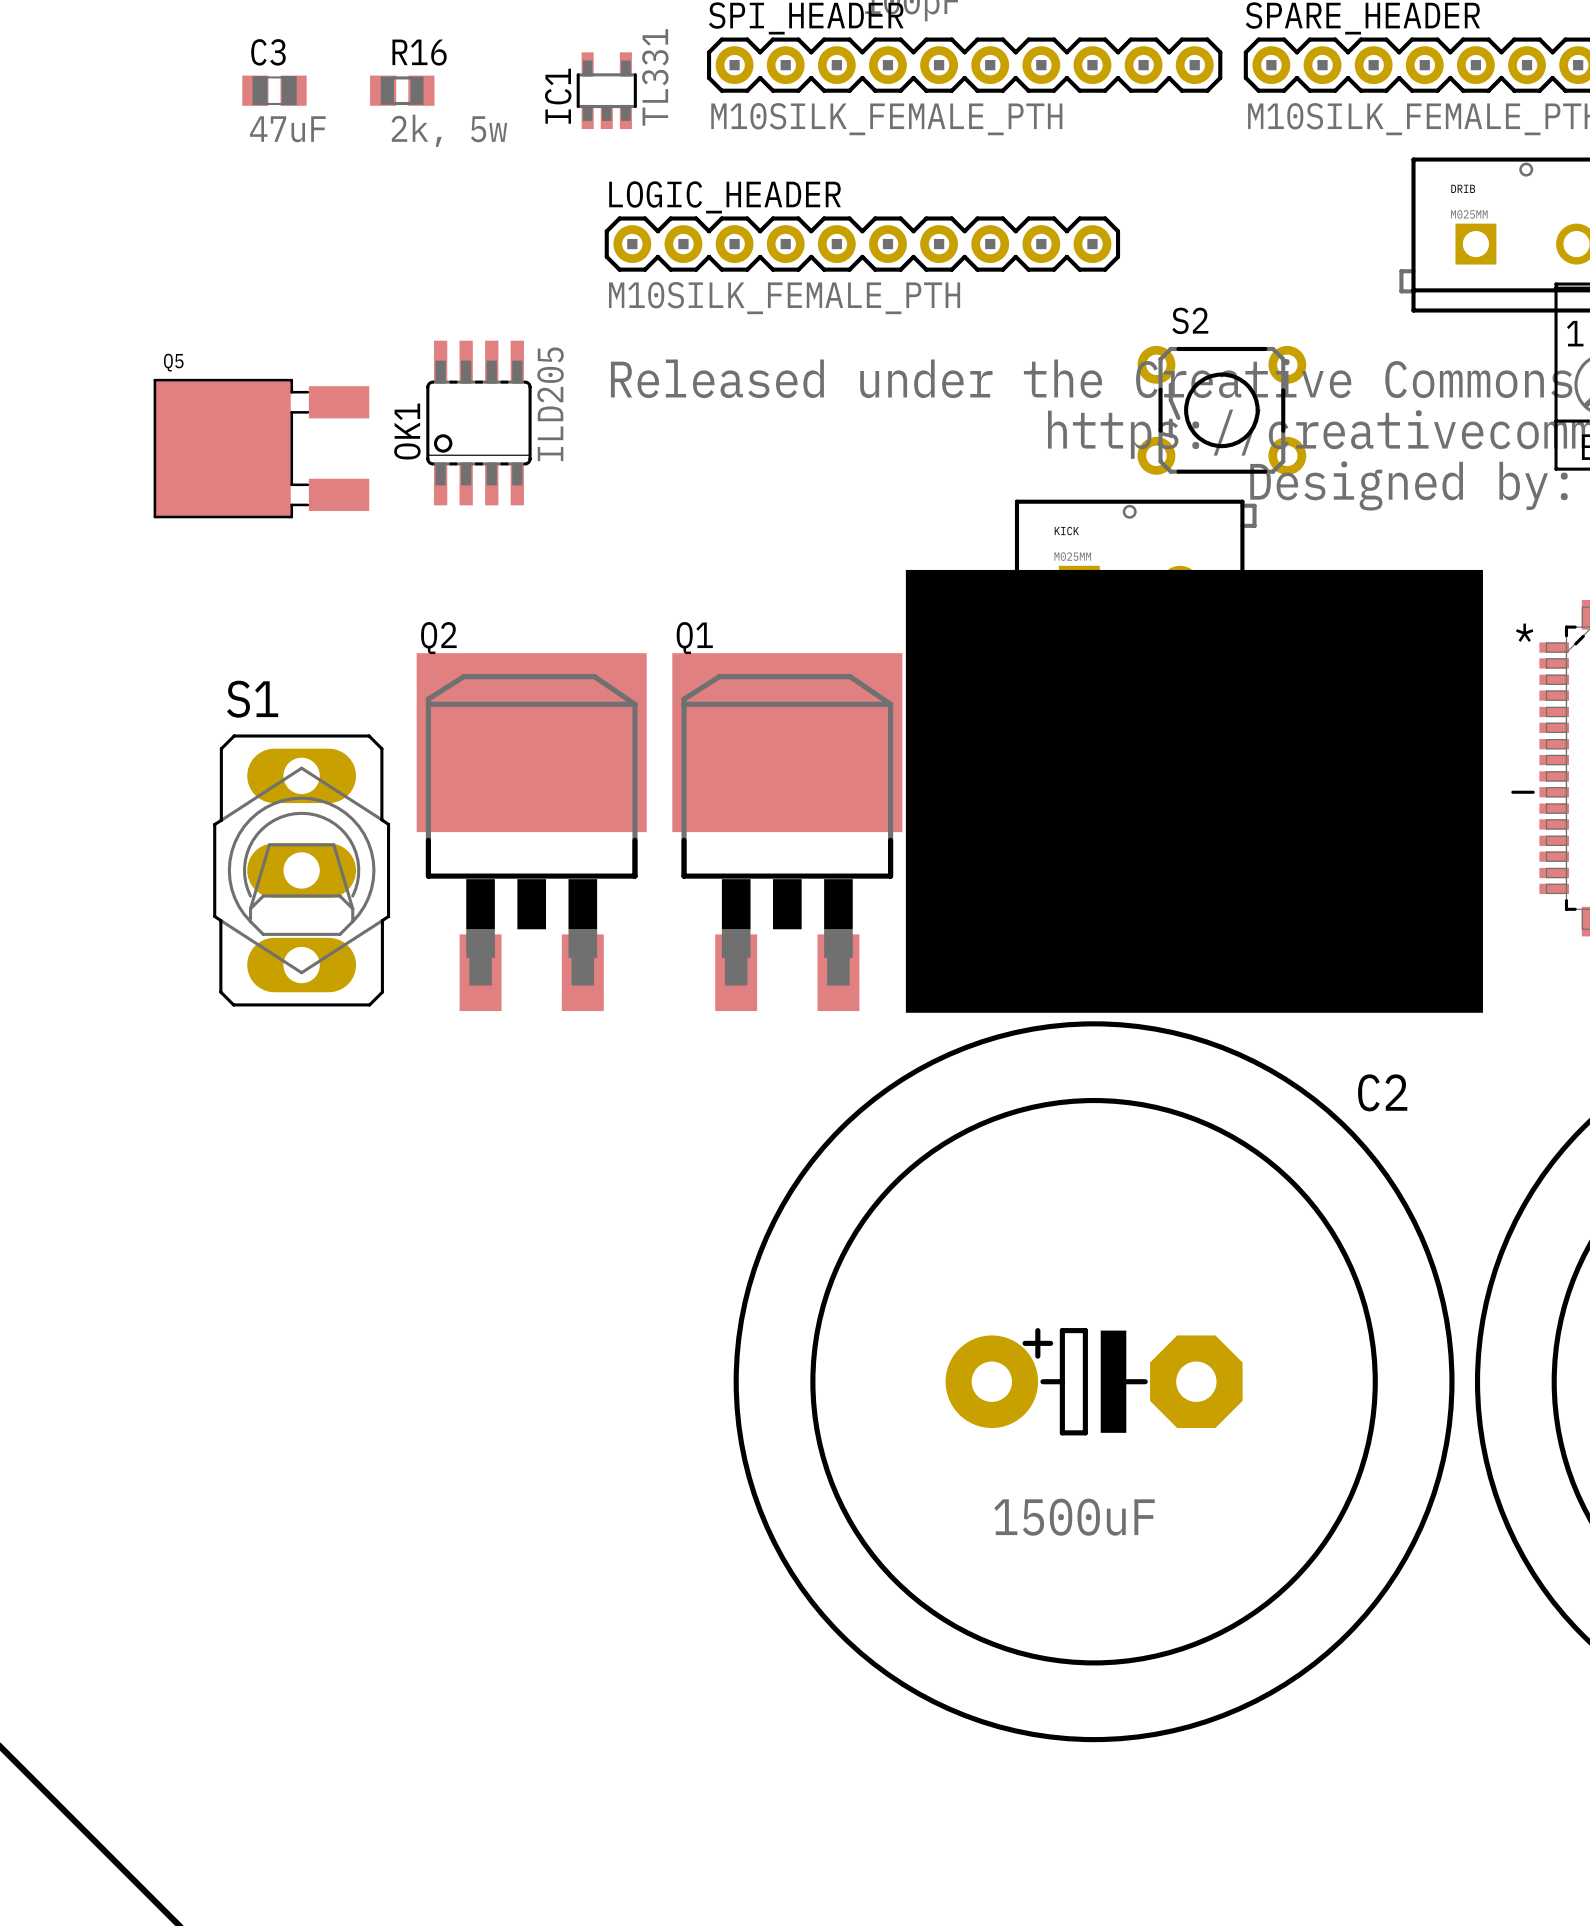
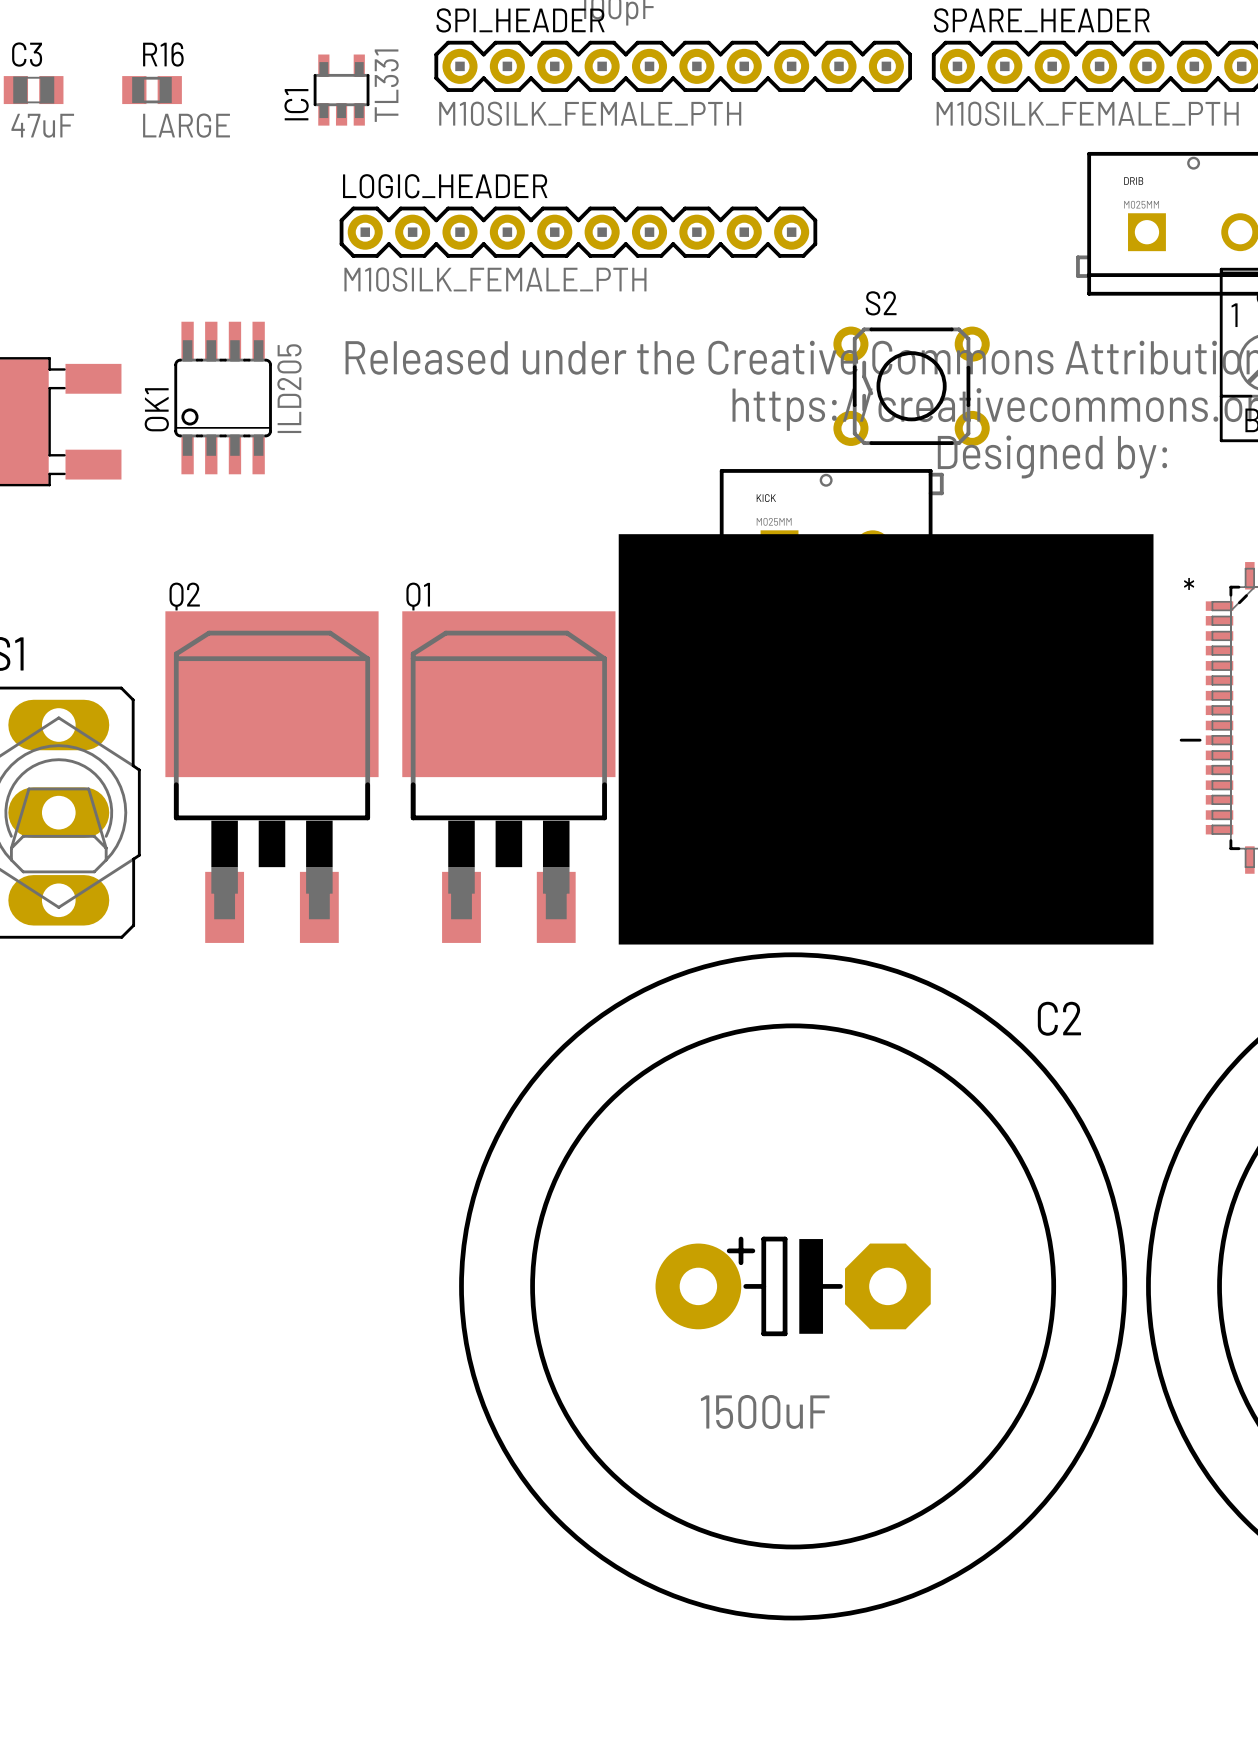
R16 value: 2k, 5w (449, 130) -> LARGE (186, 125)

